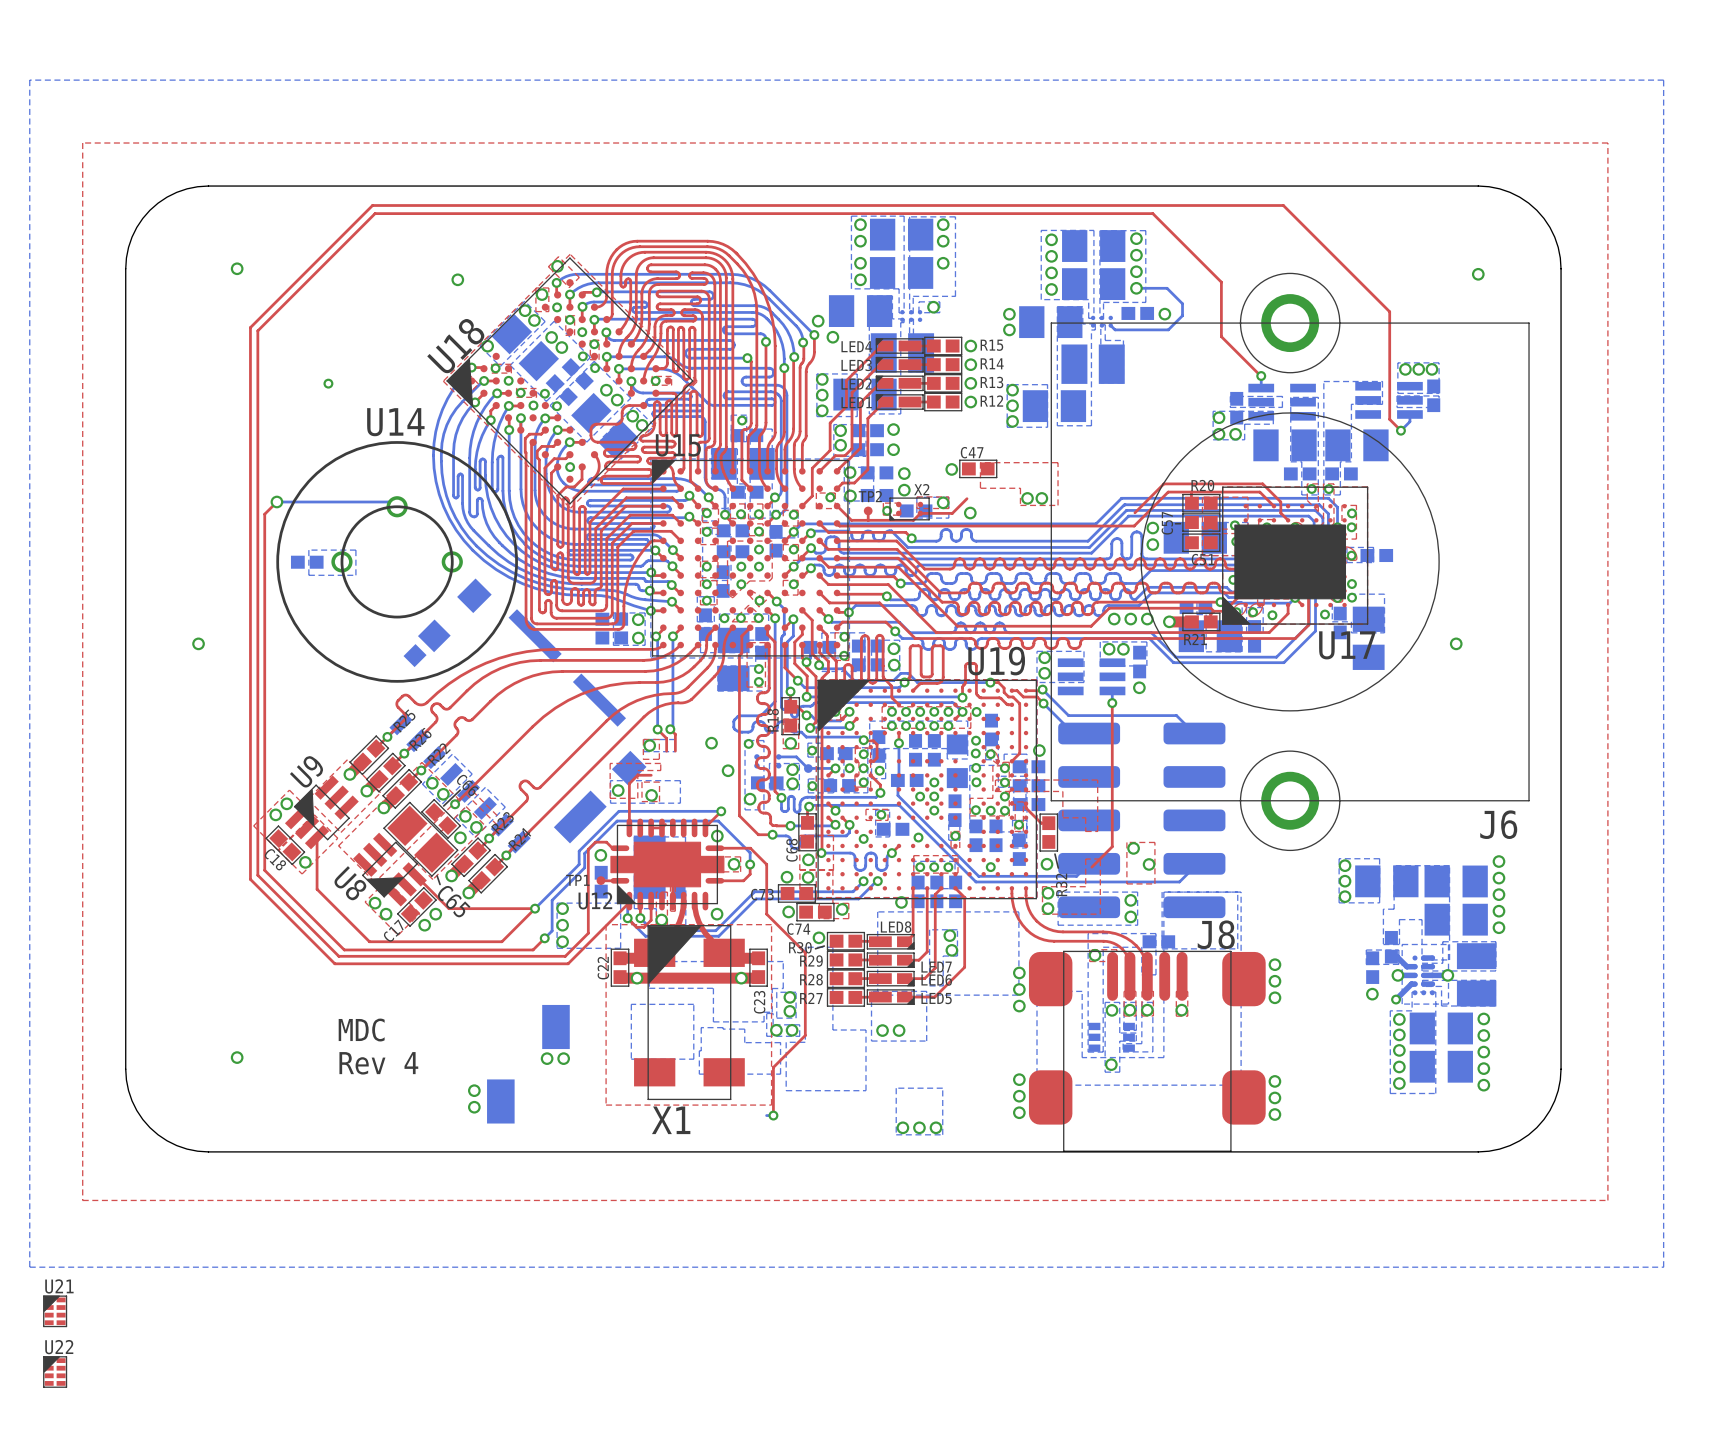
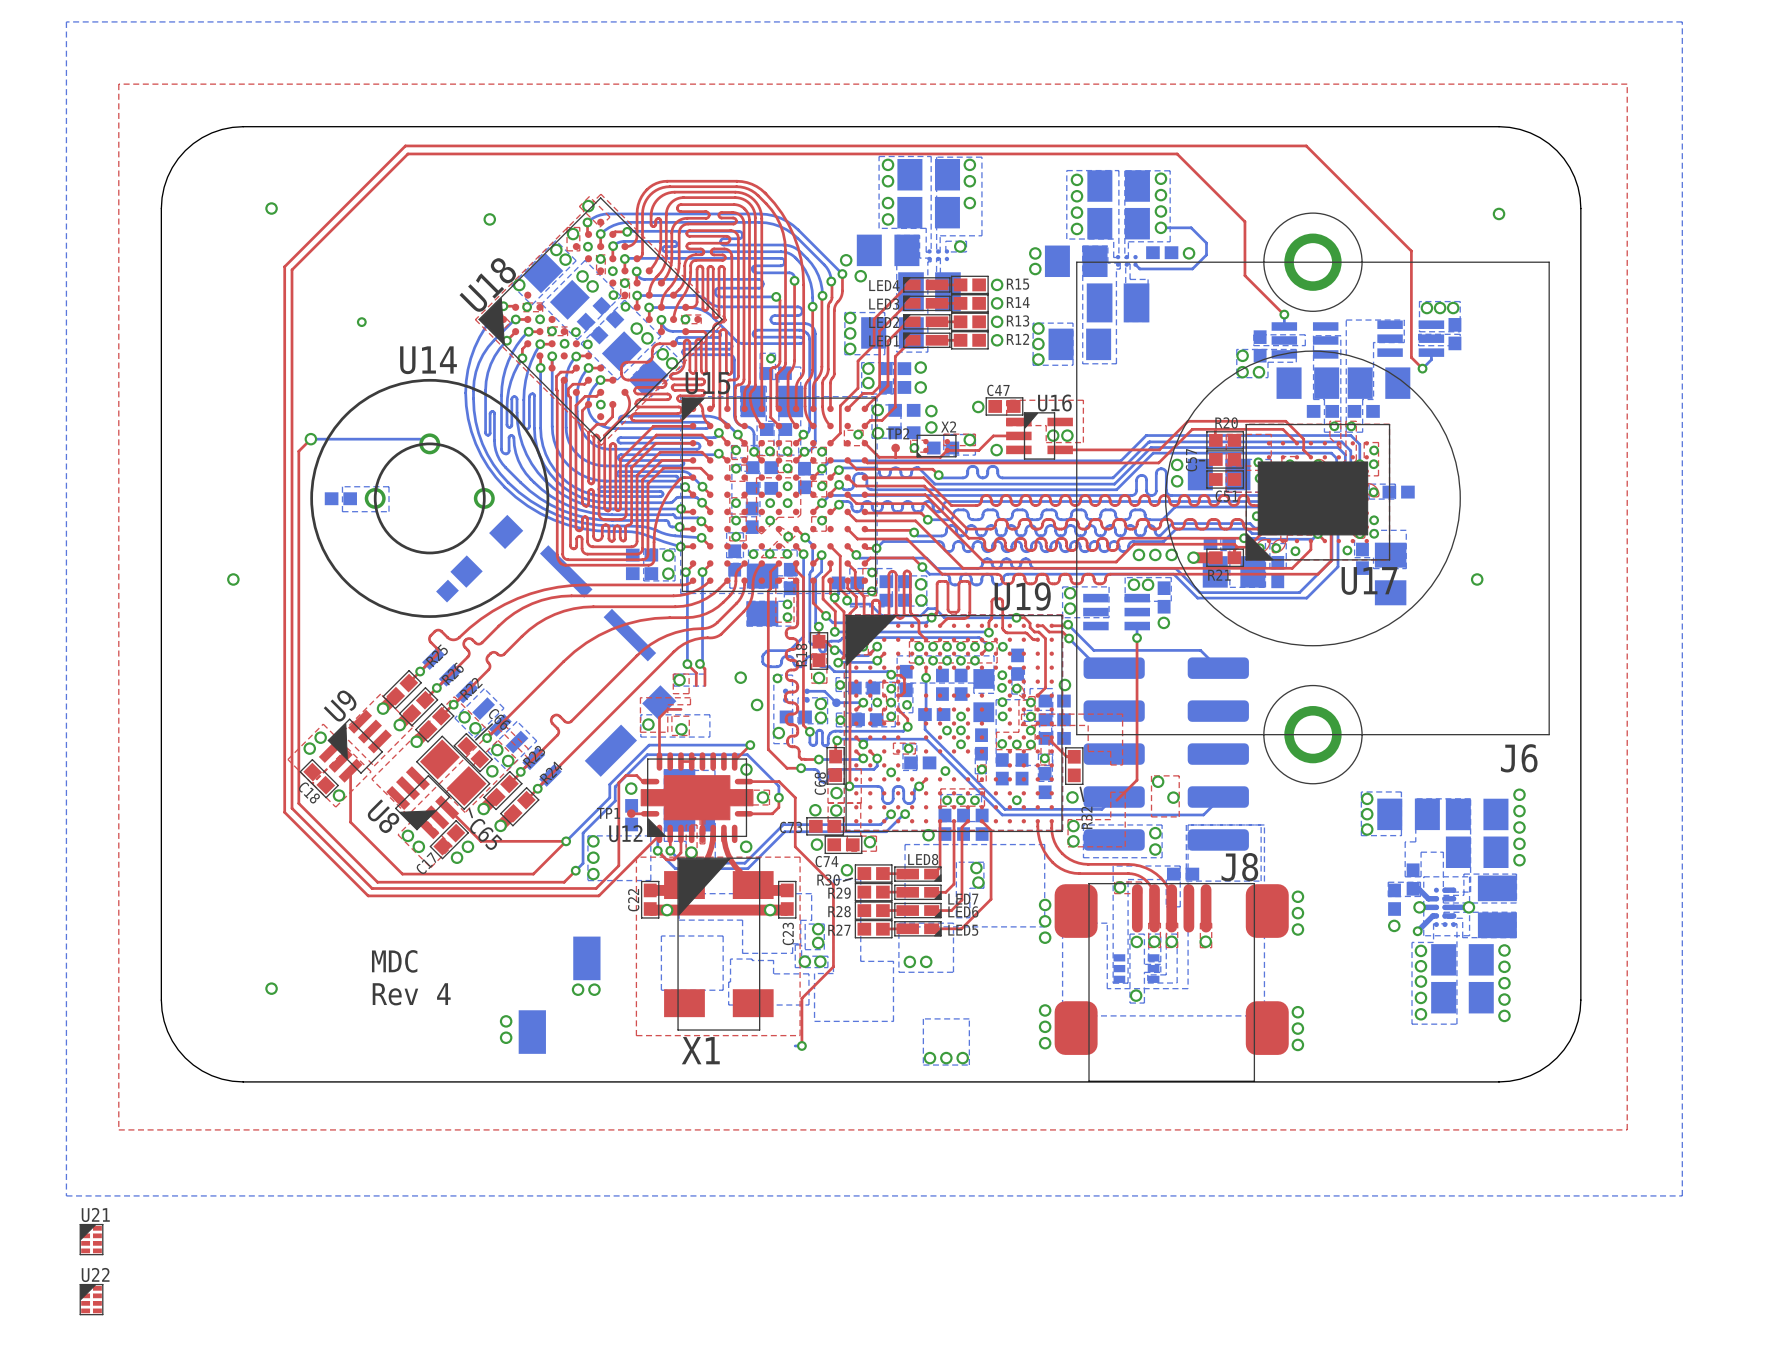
top track: none -> (993, 435) (1018, 435)
U16: none -> (1039, 435)
top track: none -> (1060, 449) (1159, 449)

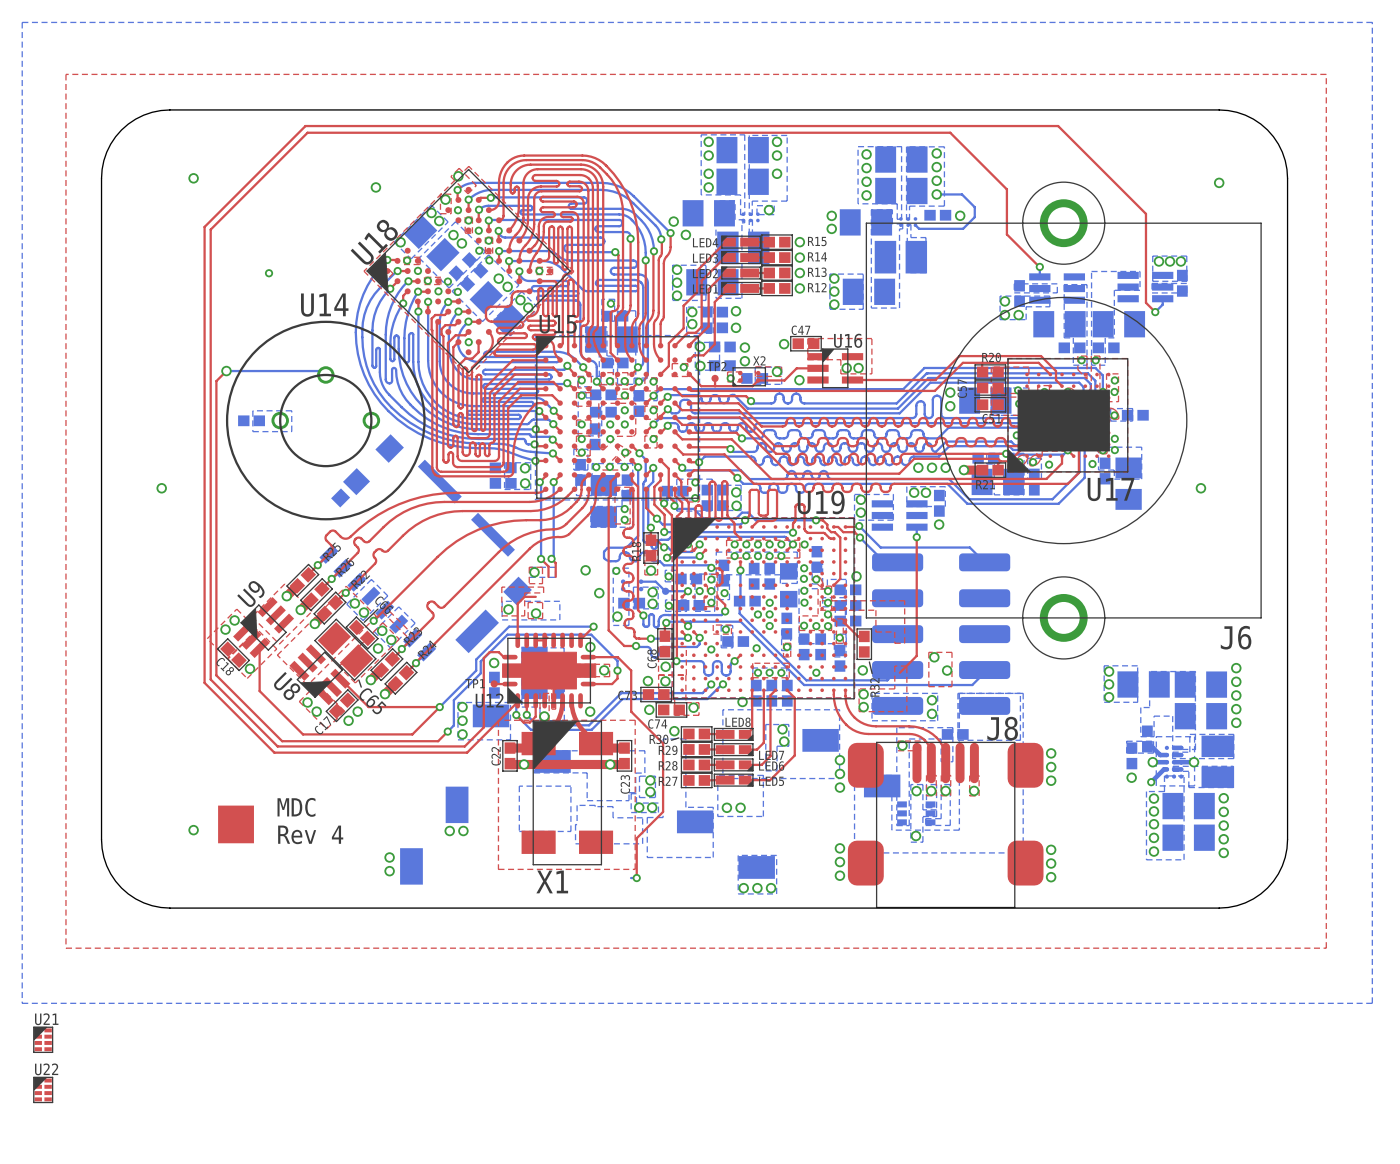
part: none -> (521, 738)
part: none -> (851, 763)
drawing: none -> [218, 805, 254, 844]
part: none -> (725, 844)

